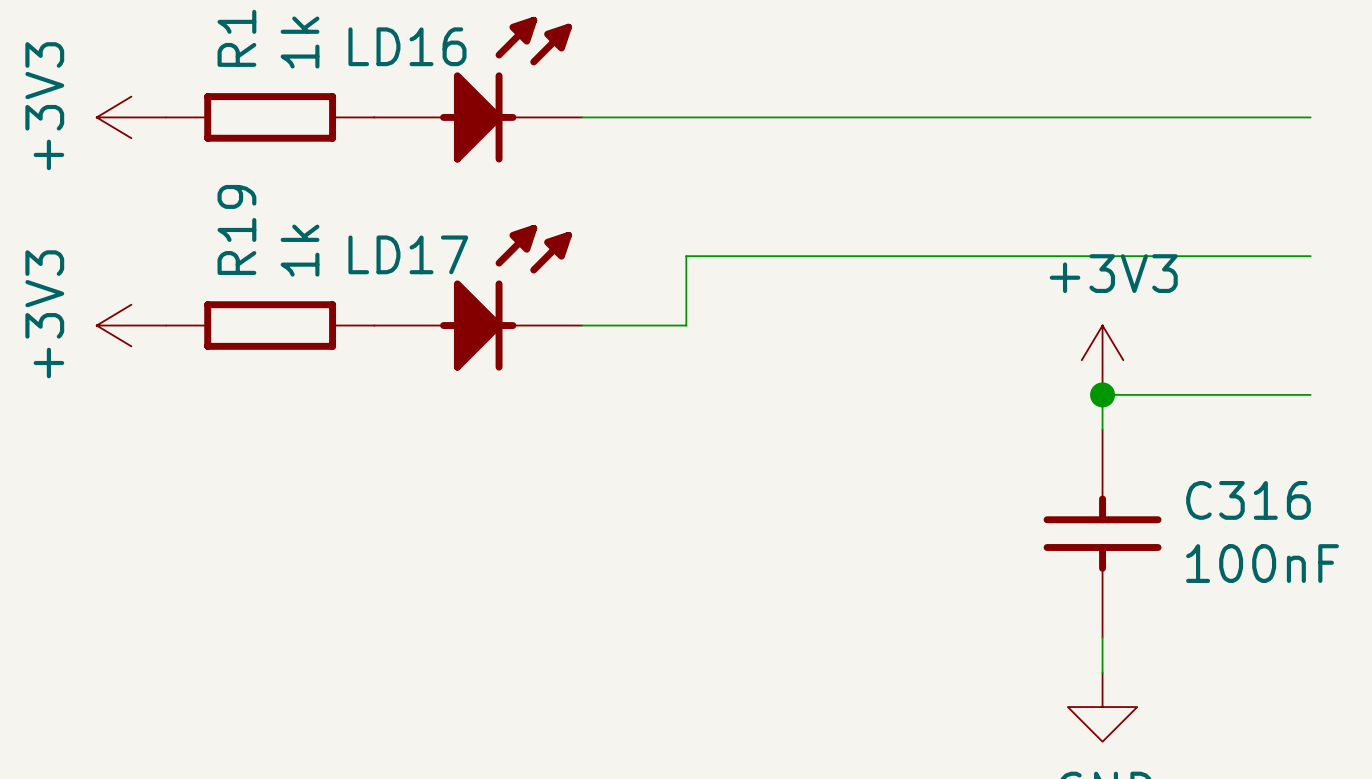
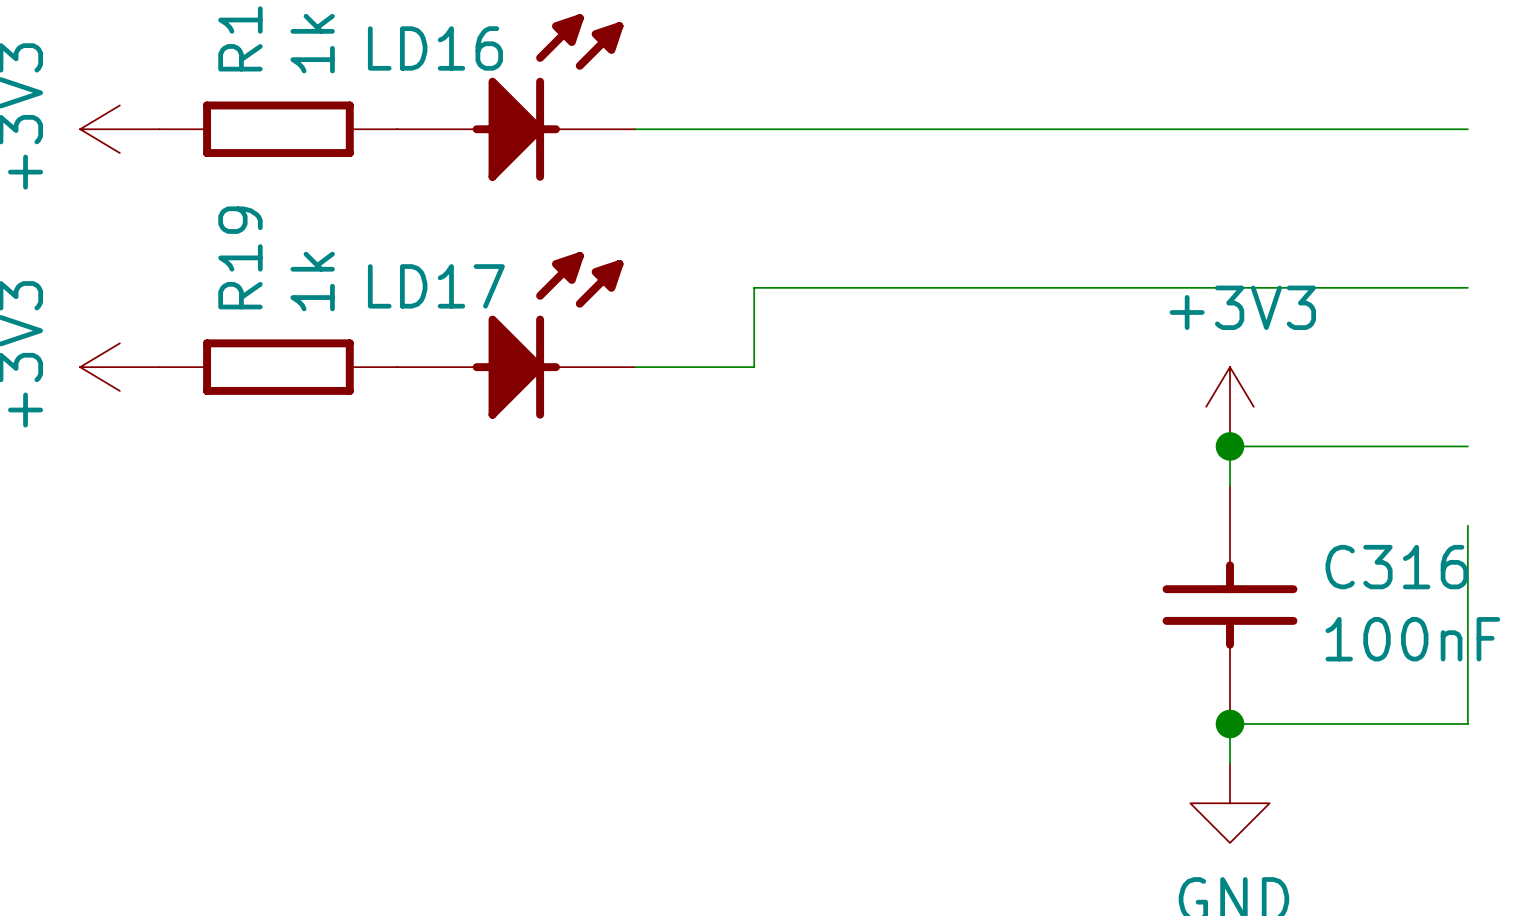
wire: none -> (1467, 525) (1467, 723) (1229, 723)
junction: none -> (1229, 723)

